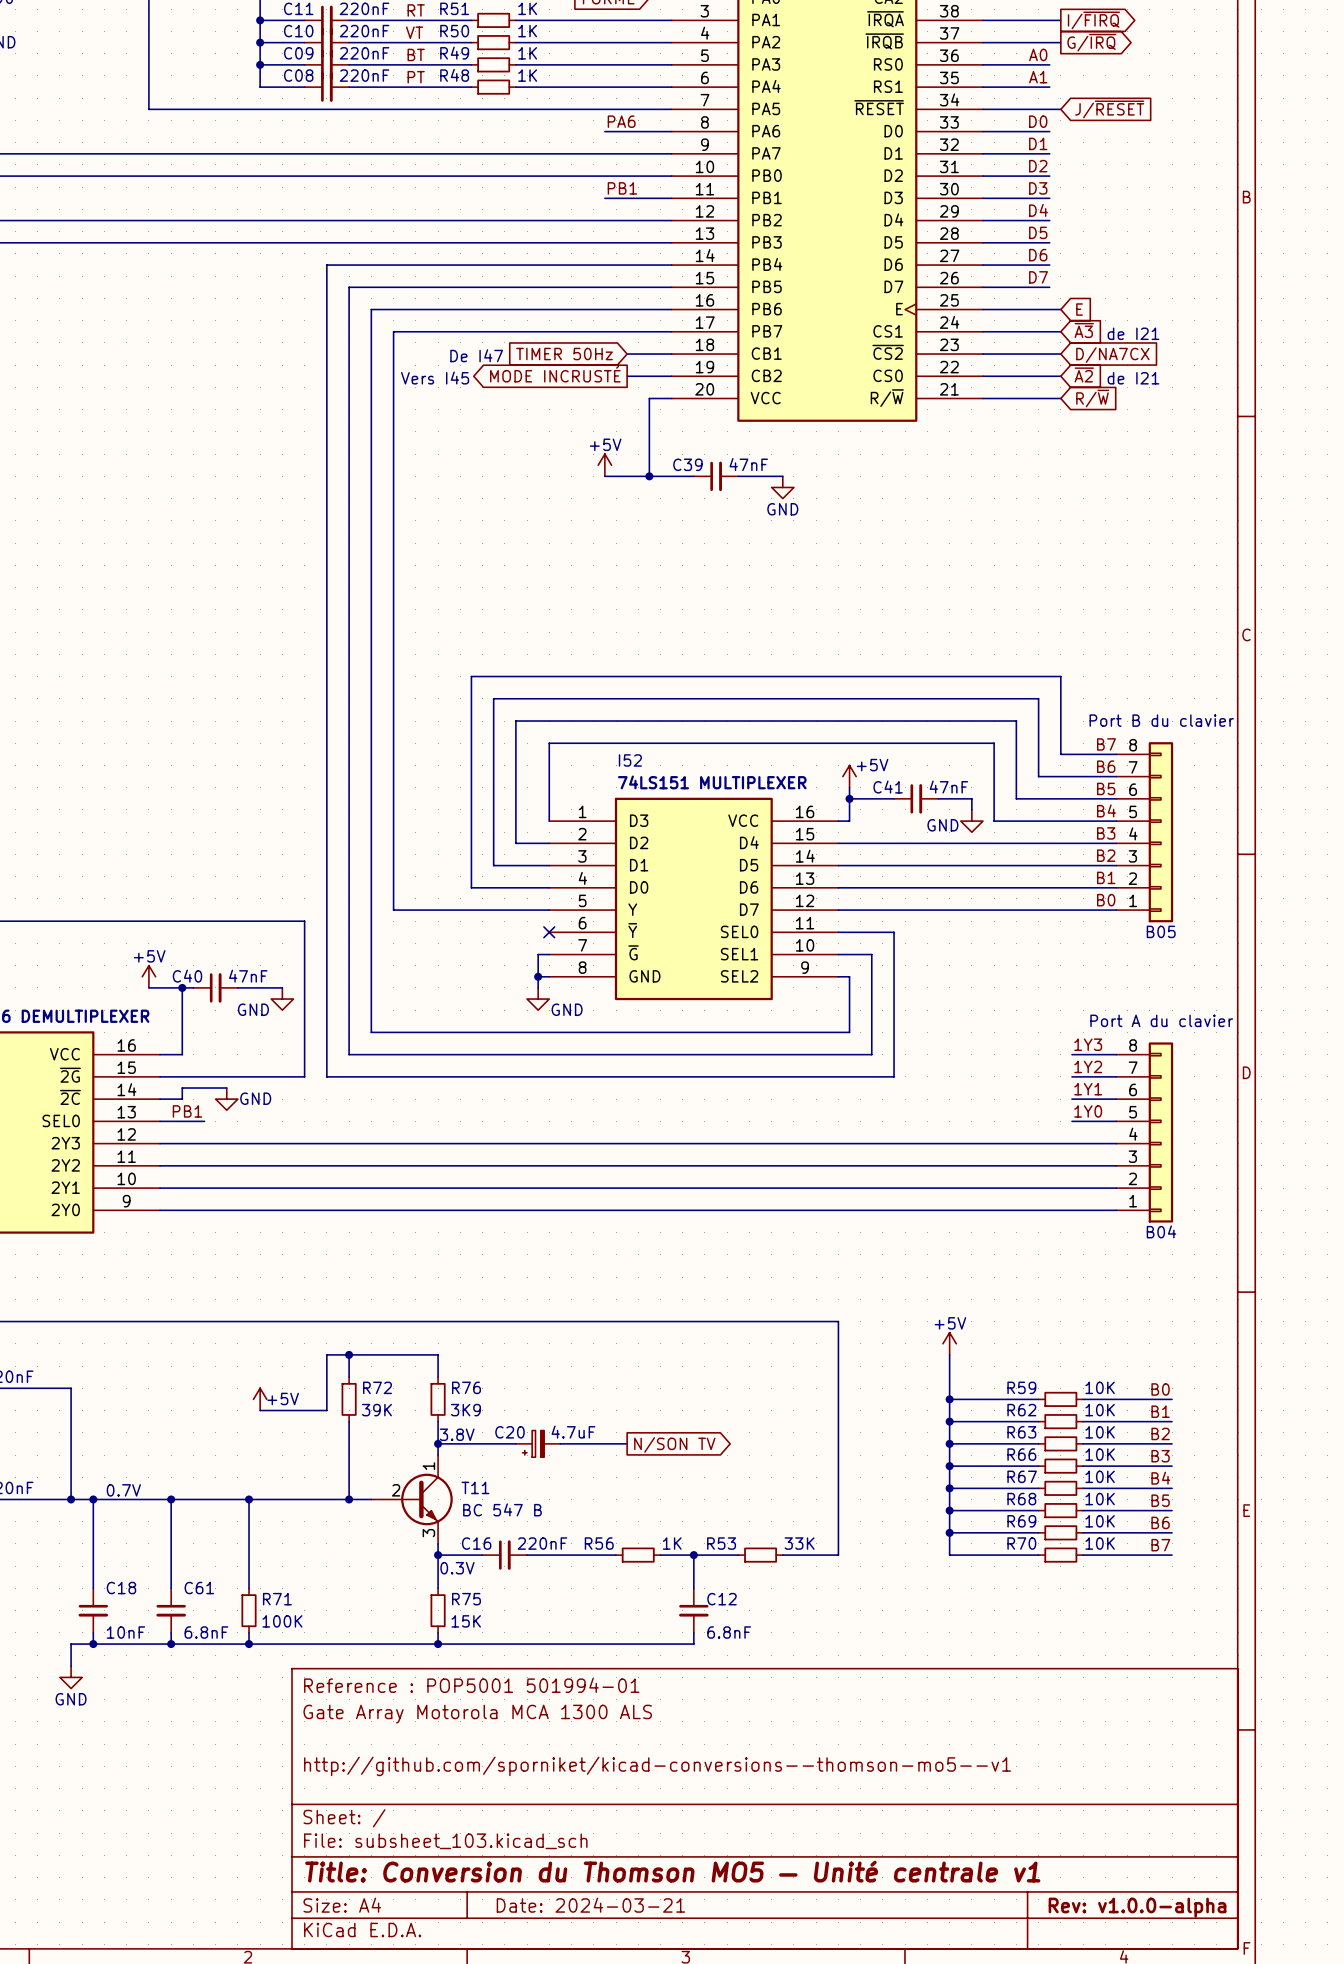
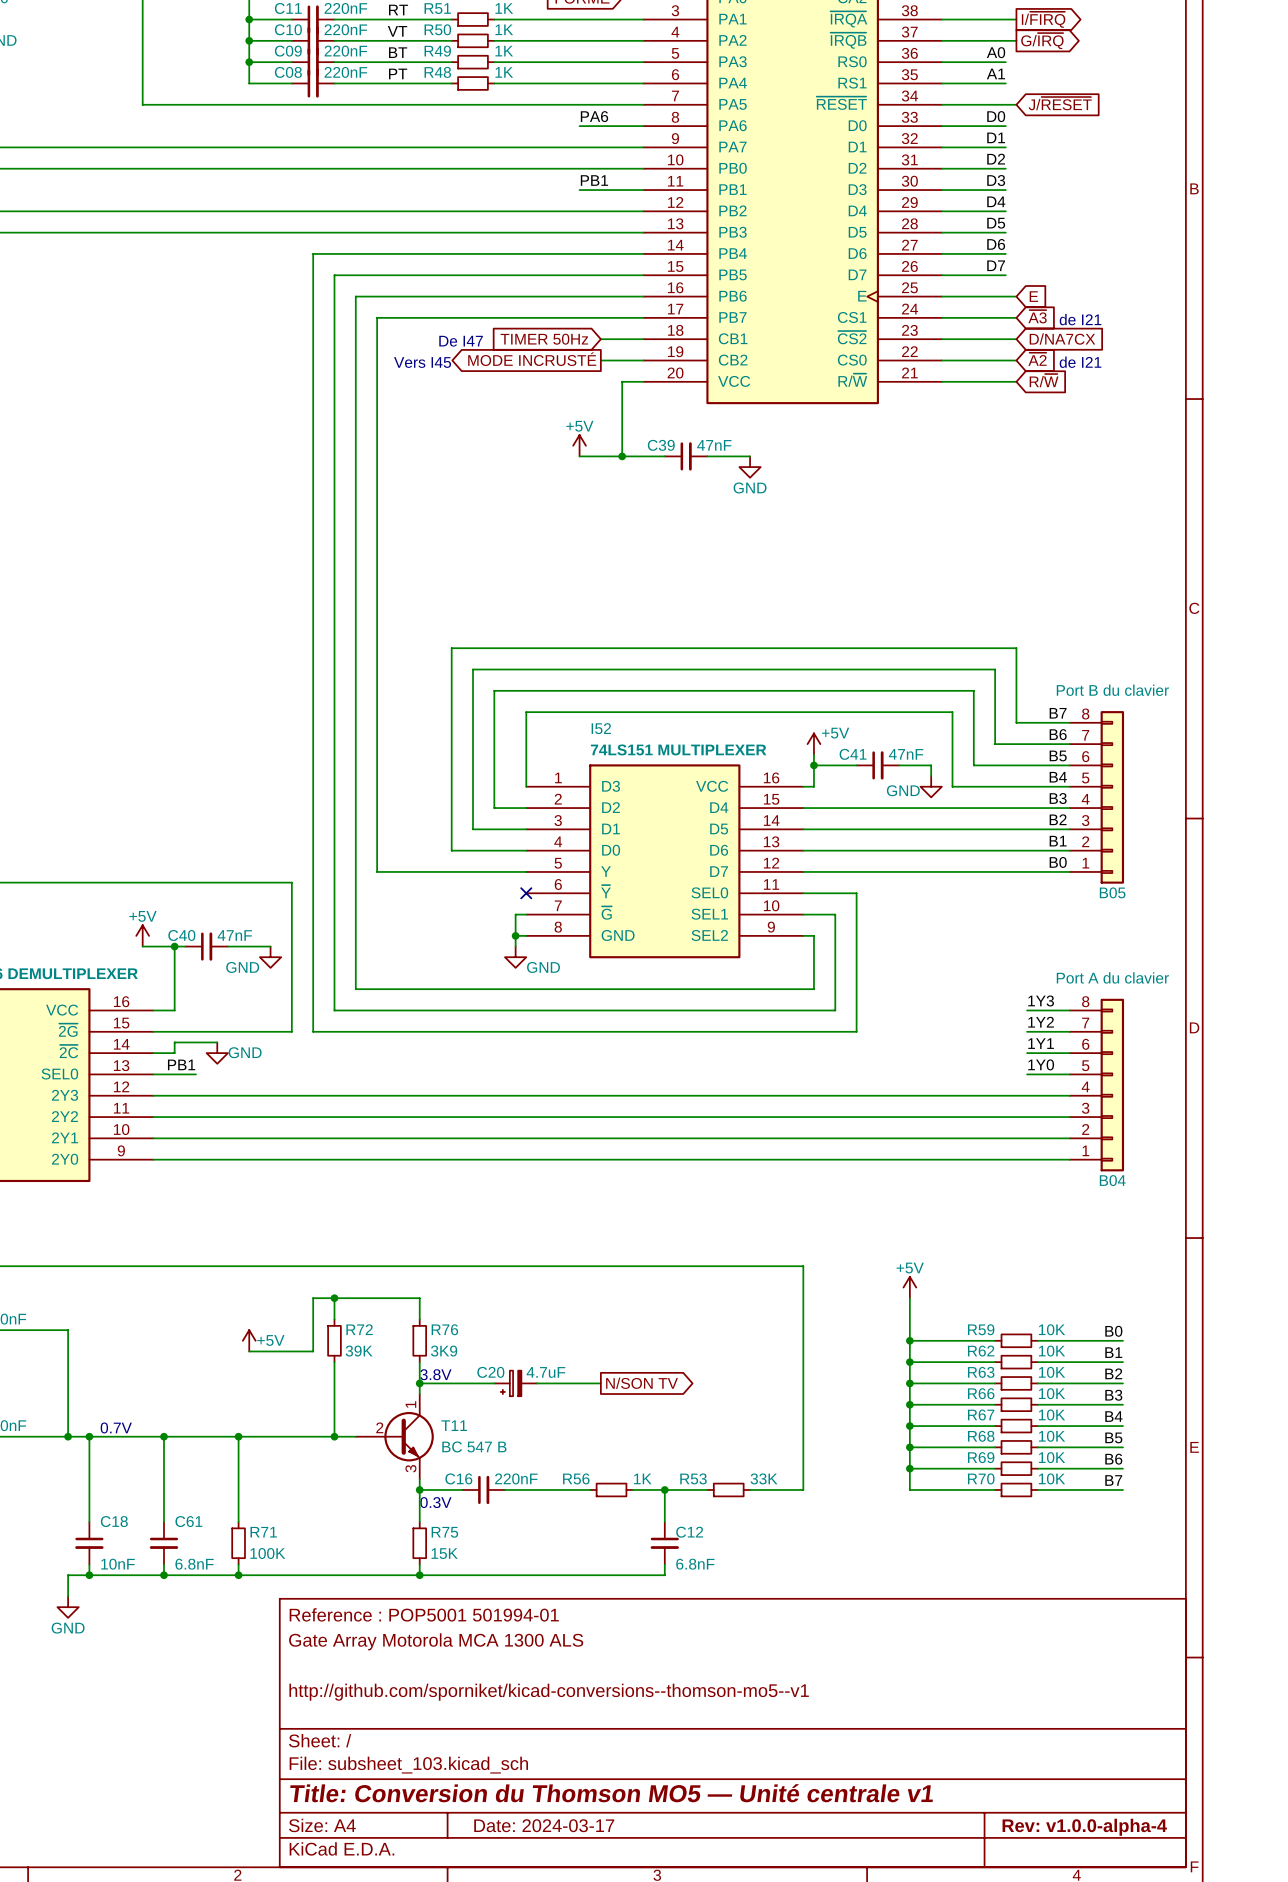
title block: Date: 2024-03-21 (590, 1905) -> Date: 2024-03-17 (544, 1825)
title block: Rev: v1.0.0-alpha (1137, 1907) -> Rev: v1.0.0-alpha-4 (1084, 1827)

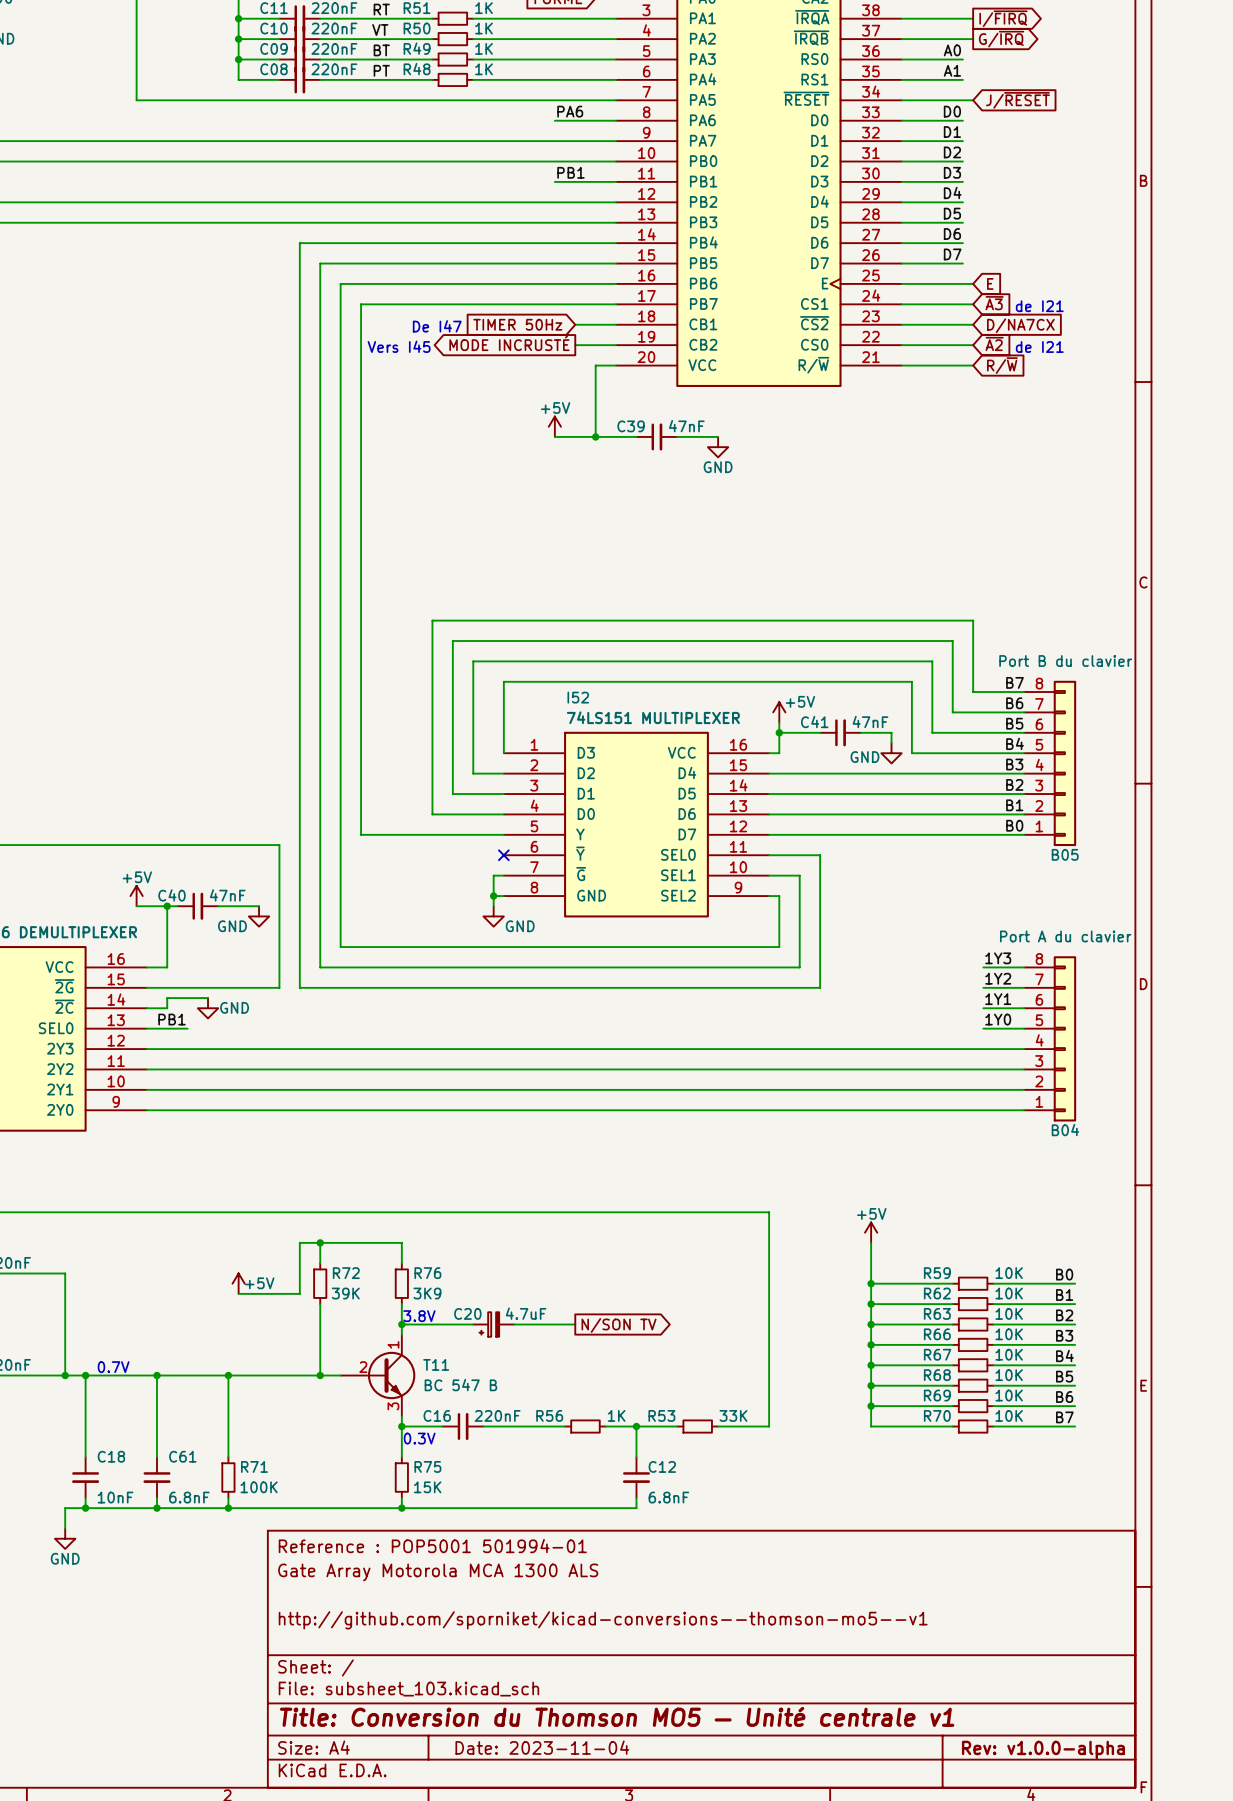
title block: Date: 2024-03-17 (544, 1825) -> Date: 2023-11-04 (542, 1747)
title block: Rev: v1.0.0-alpha-4 (1084, 1827) -> Rev: v1.0.0-alpha (1043, 1749)

